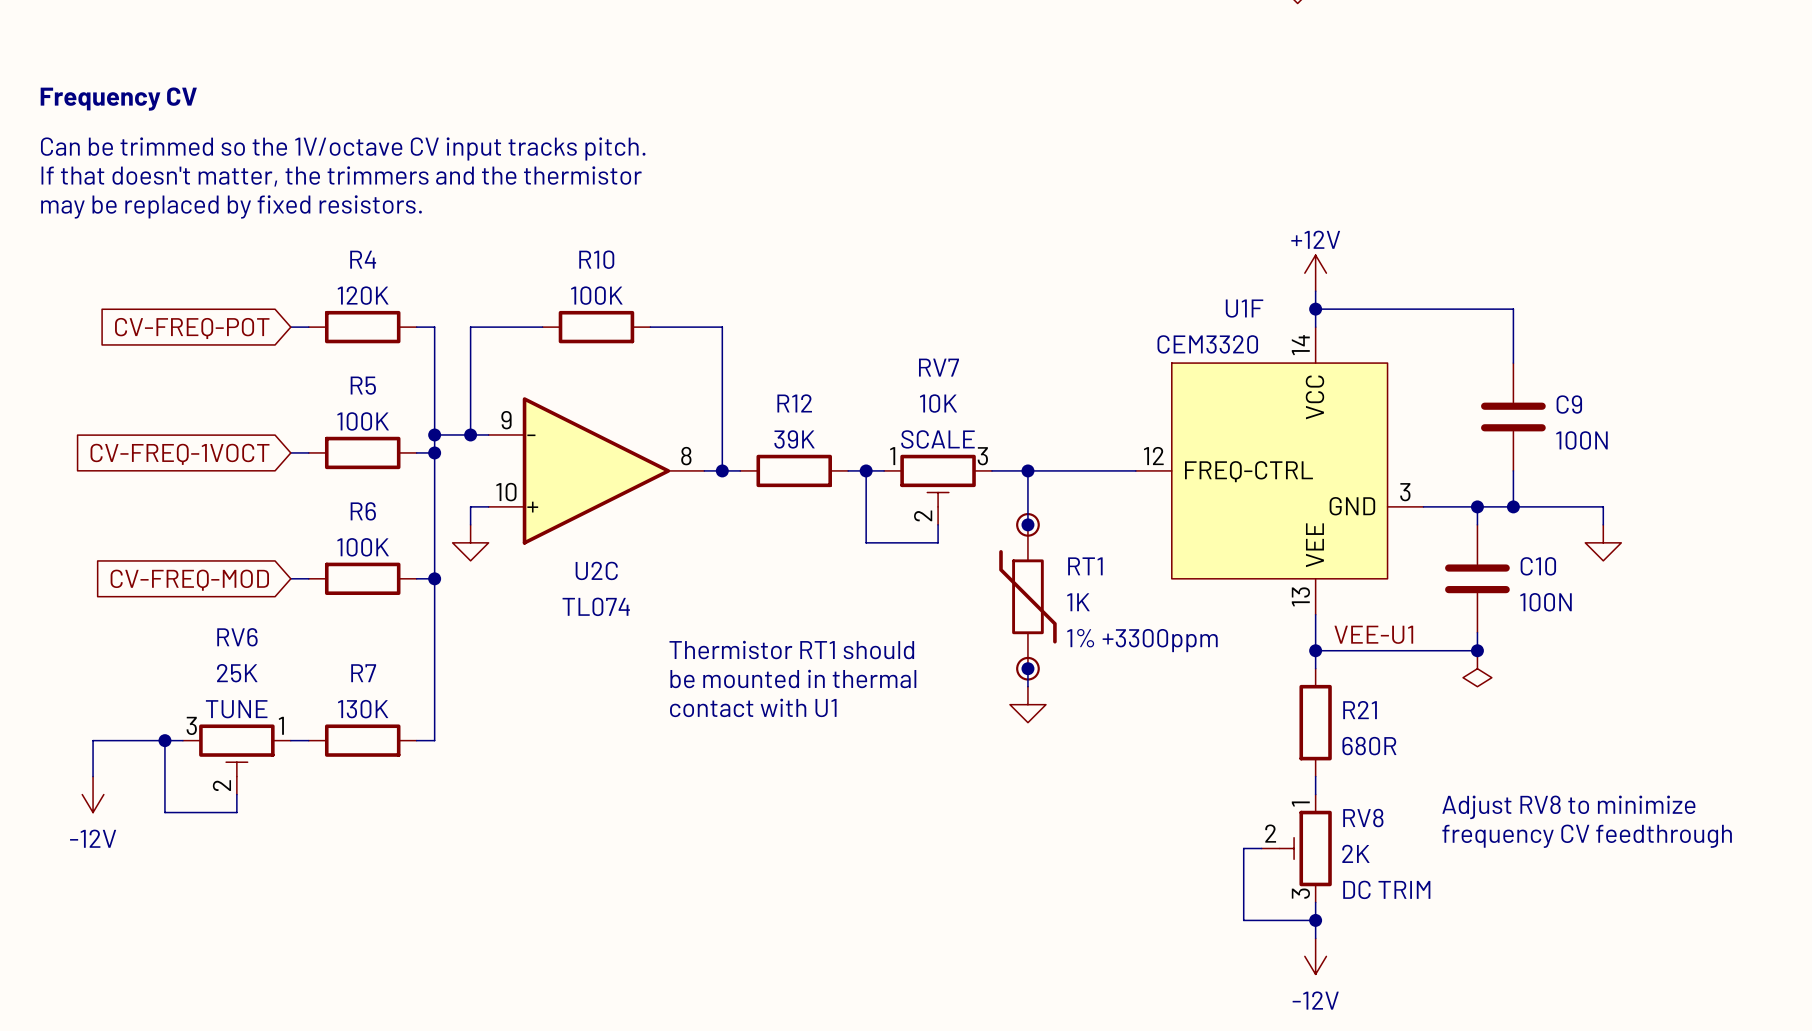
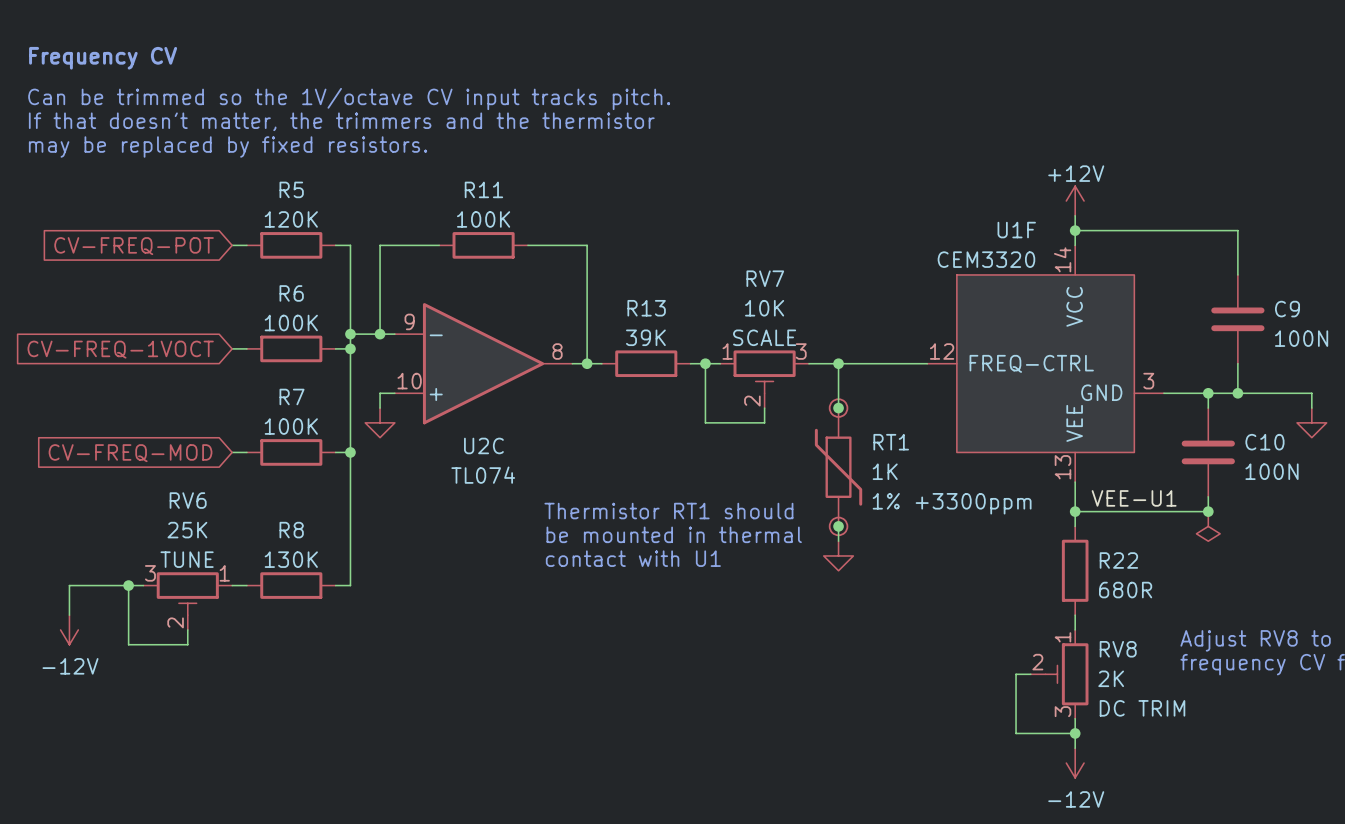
R4 name: R4 (363, 259) -> R5 (291, 189)
R10 name: R10 (596, 259) -> R11 (483, 189)
R5 name: R5 (363, 385) -> R6 (291, 293)
R12 name: R12 (794, 403) -> R13 (646, 308)
R6 name: R6 (363, 511) -> R7 (292, 396)
R7 name: R7 (363, 673) -> R8 (291, 530)
R21 name: R21 (1360, 710) -> R22 (1118, 560)

